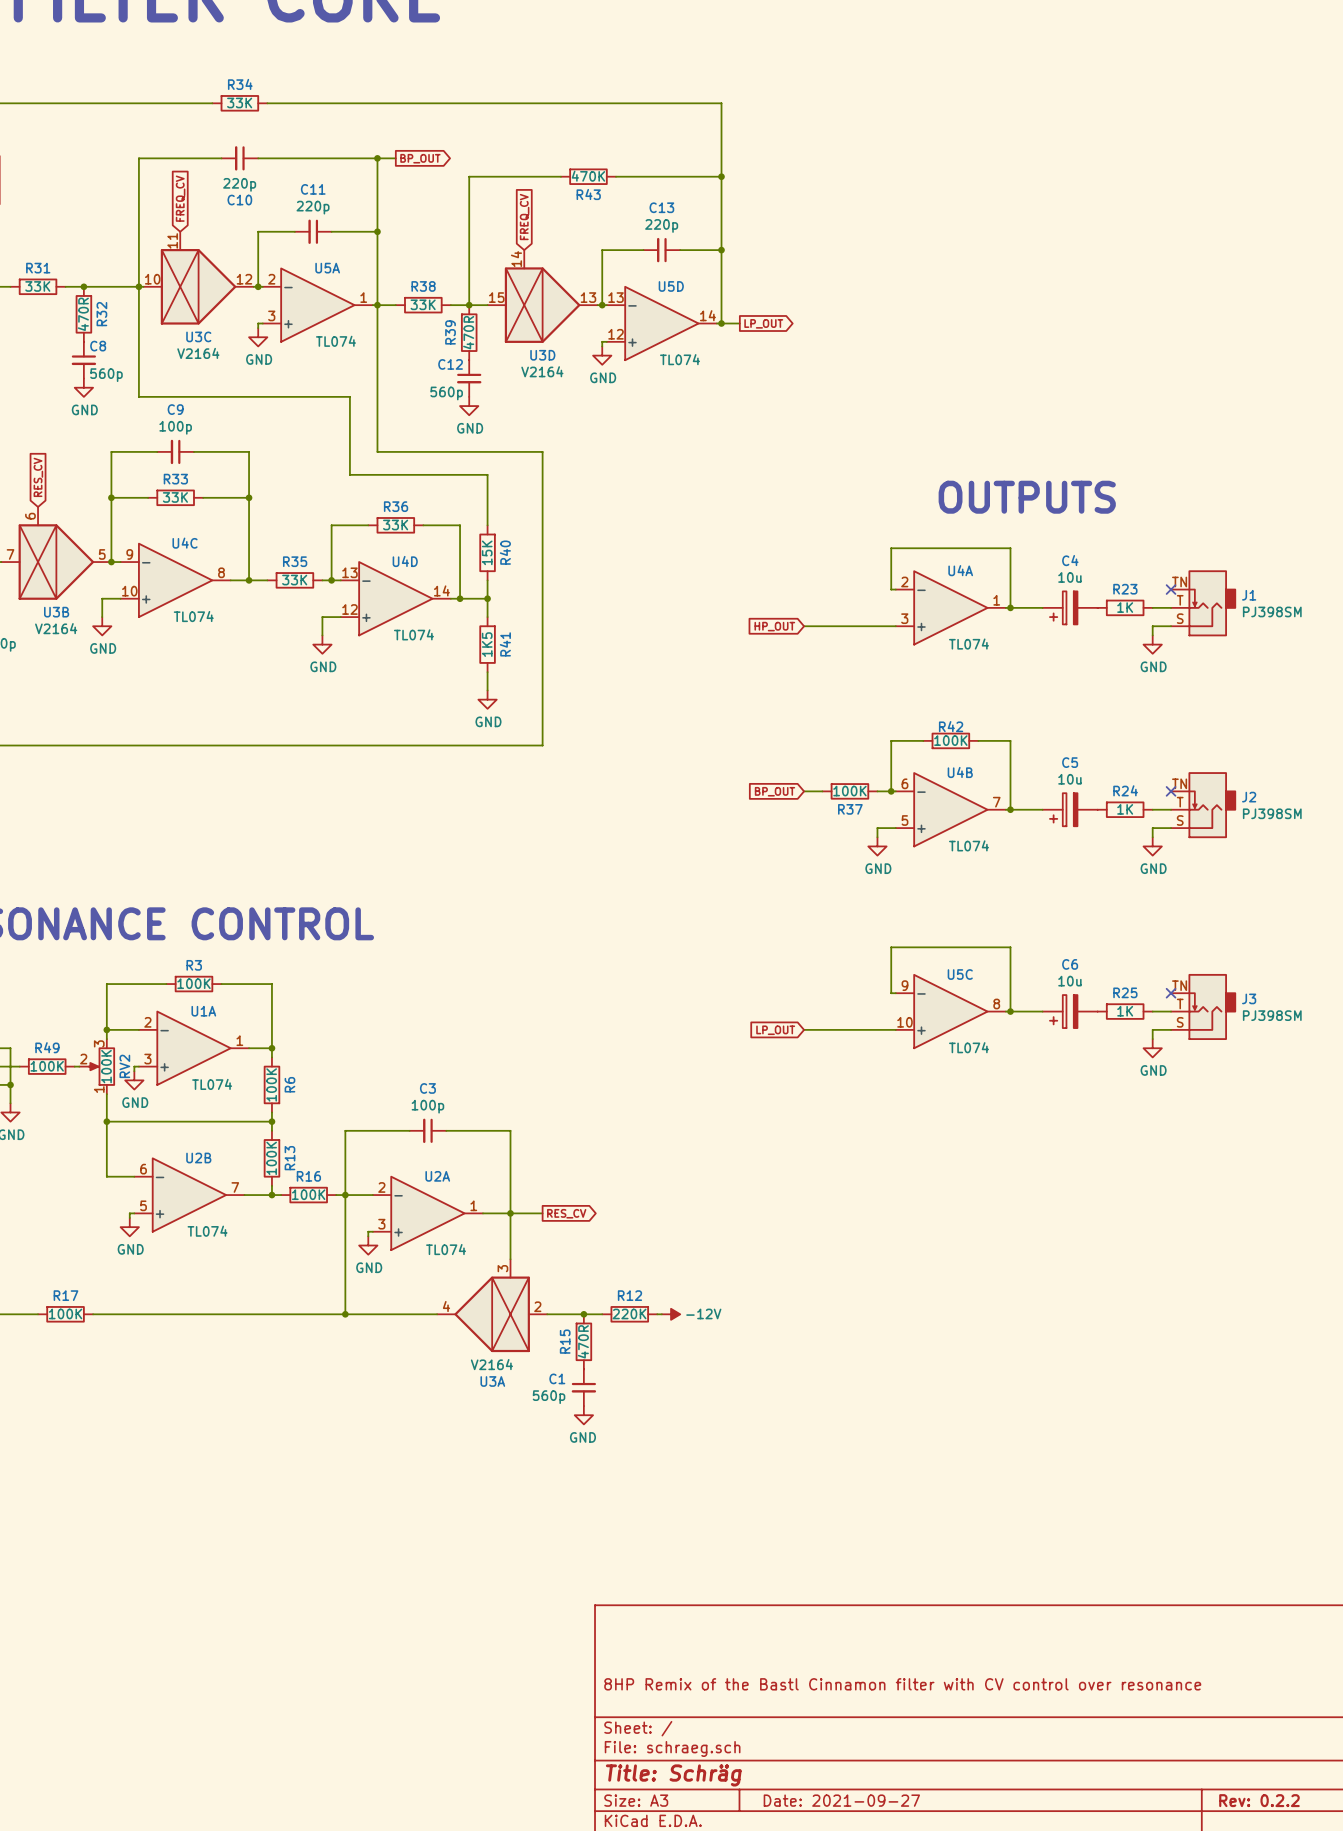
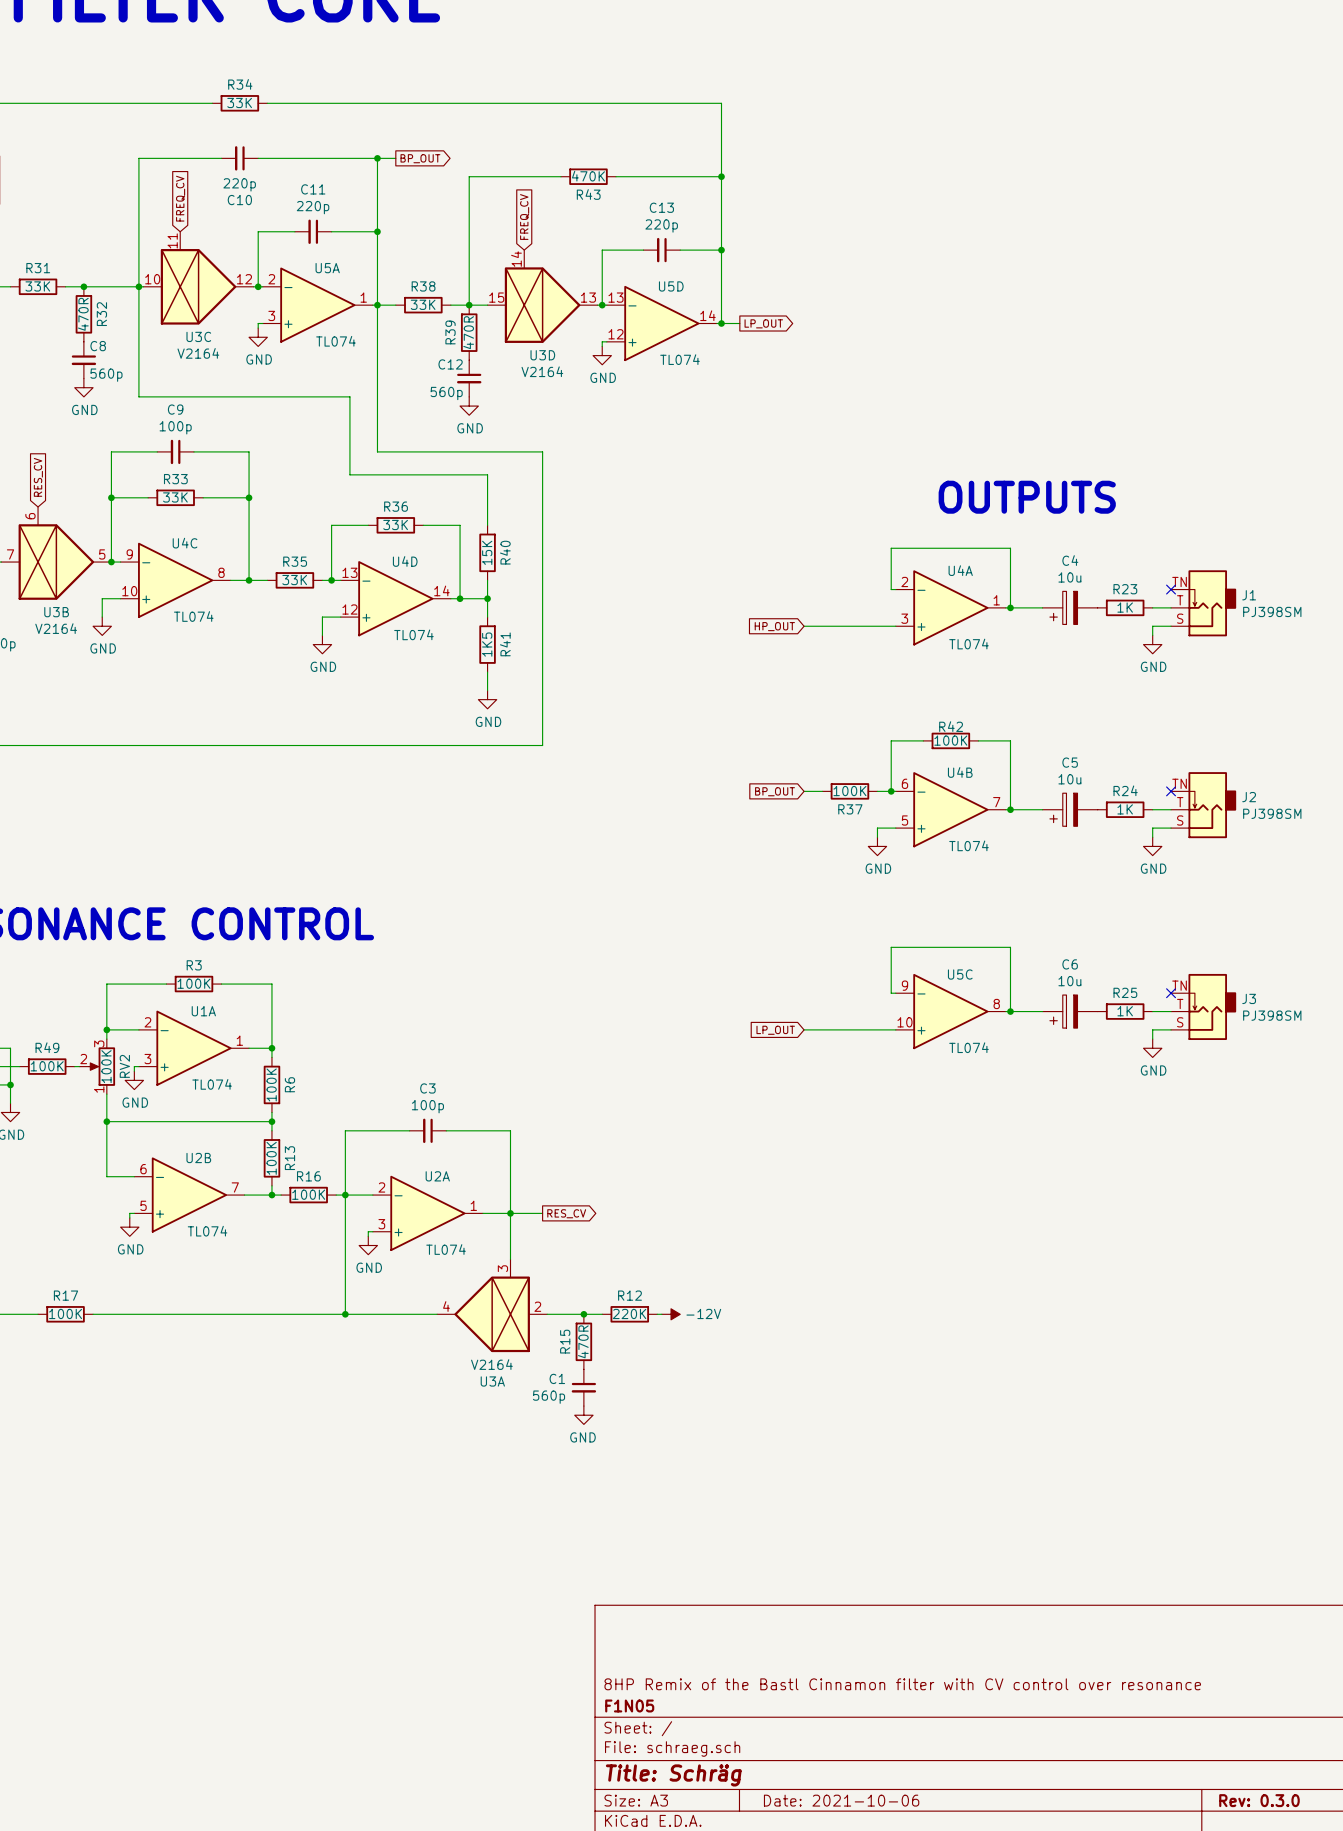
title block: none -> F1N05 (629, 1705)
title block: Date: 2021-09-27 (841, 1800) -> Date: 2021-10-06 (841, 1800)
title block: Rev: 0.2.2 (1259, 1800) -> Rev: 0.3.0 (1259, 1800)

